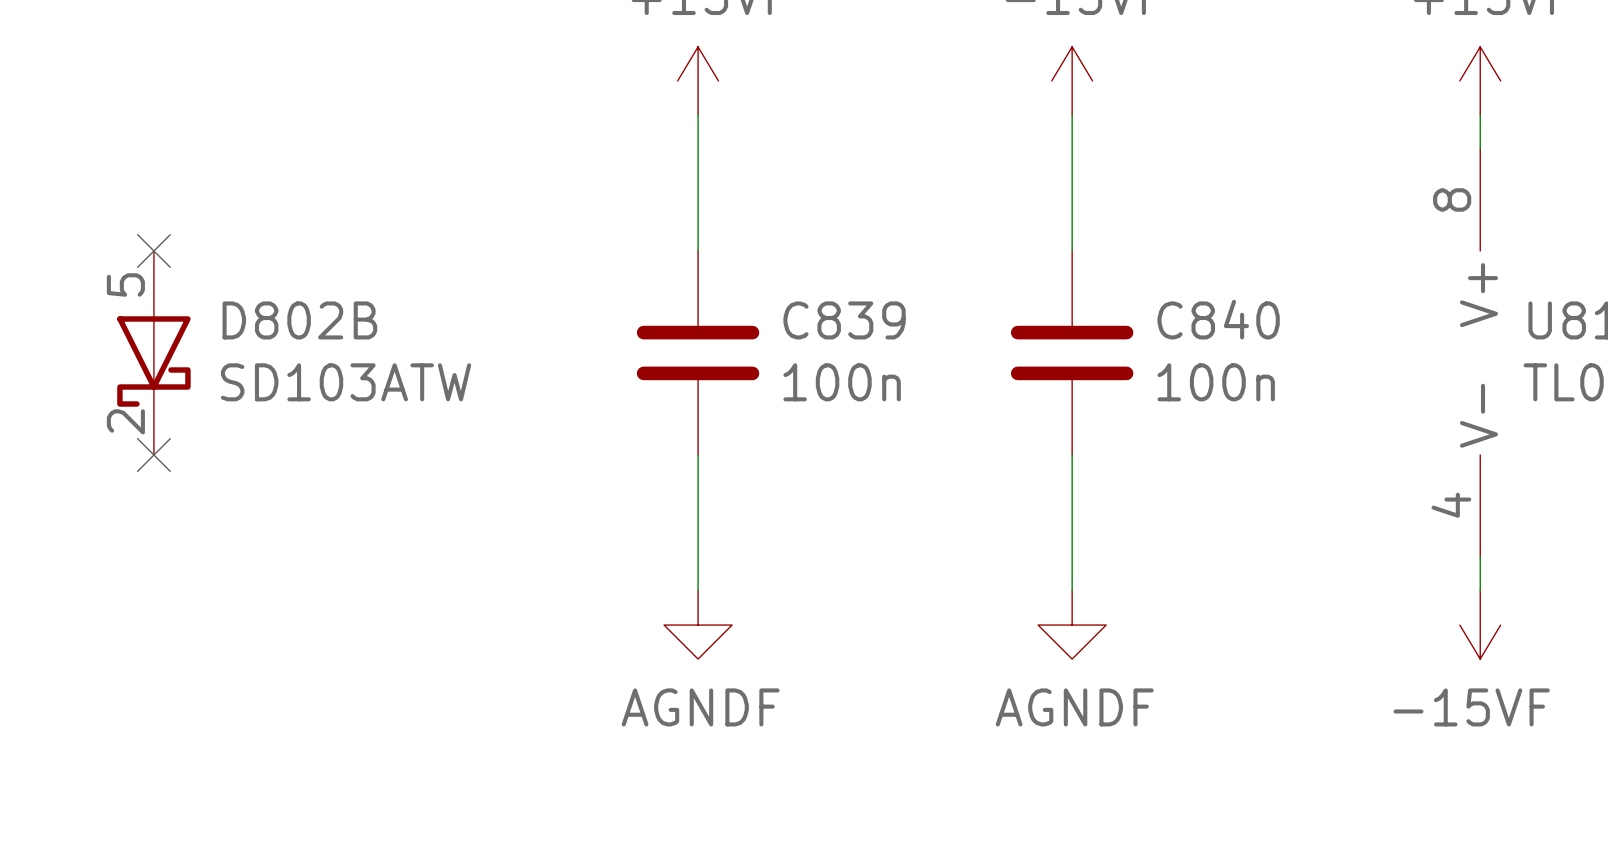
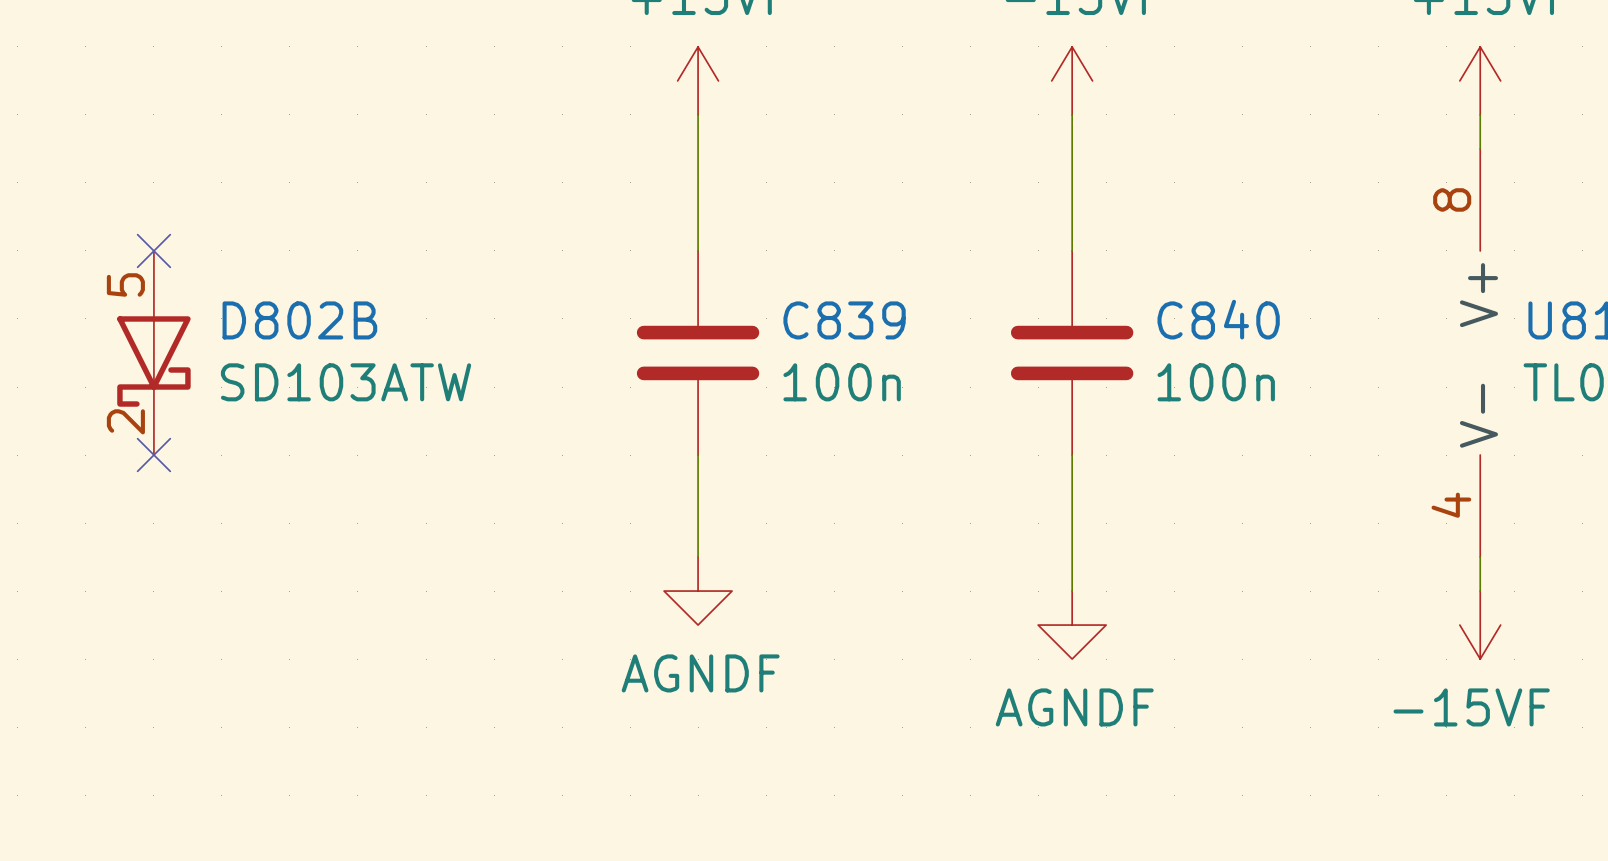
power symbol position: AGNDF (698, 625) -> AGNDF (698, 591)

